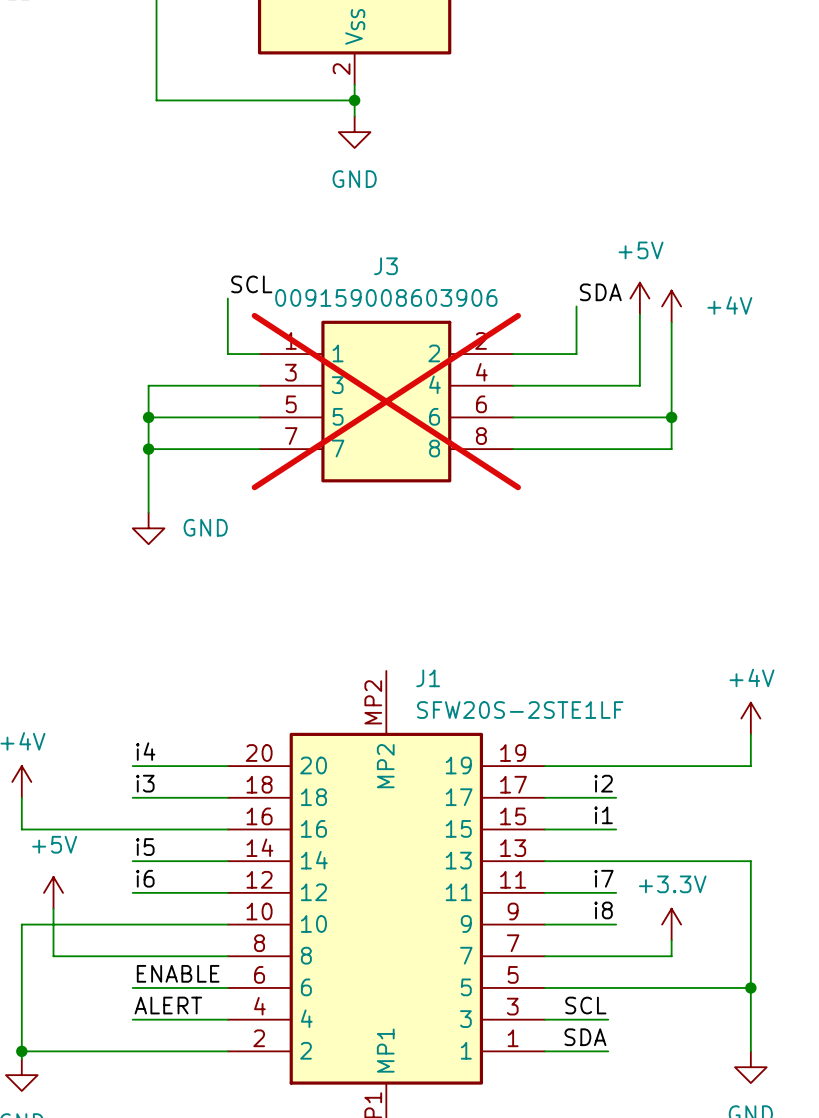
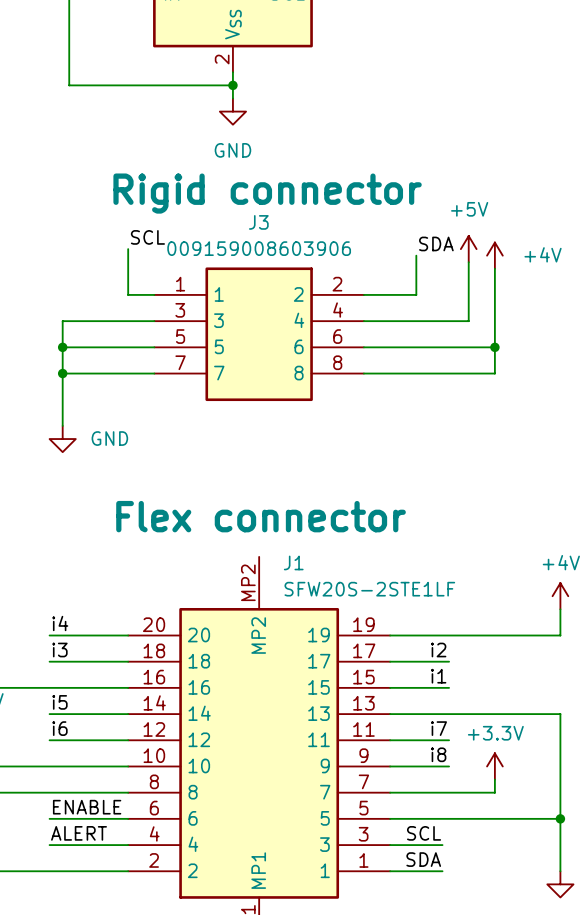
J3 text: none -> Rigid connector (267, 193)
J3 do-not-place cross: (386, 401) -> none
J1 text: none -> Flex connector (261, 516)

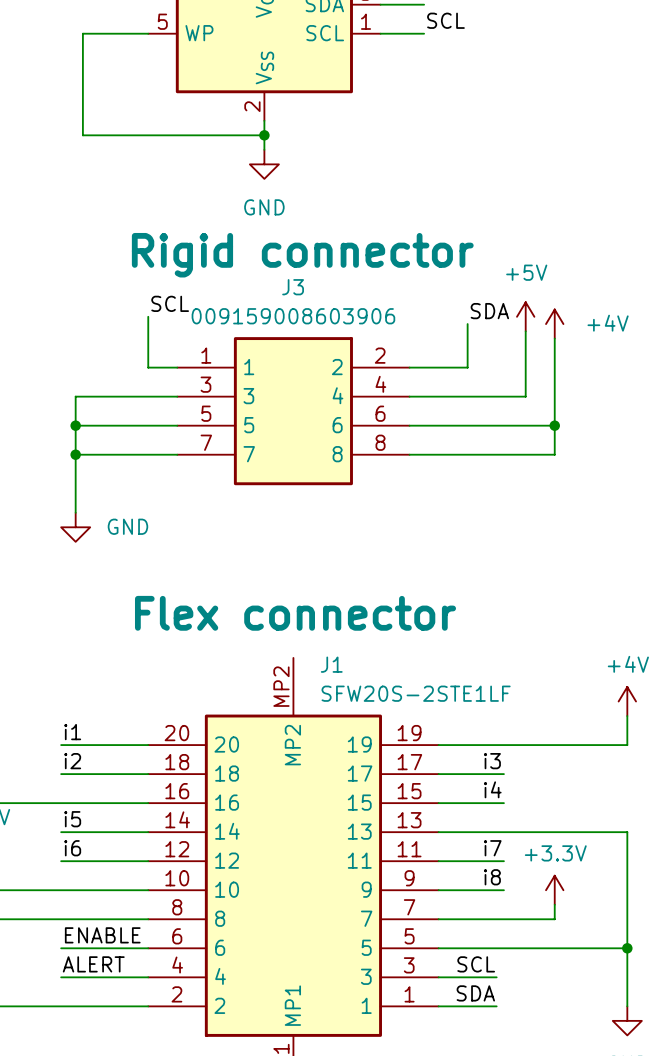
label: i4 (60, 623) -> i1 (72, 732)
label: i3 (59, 650) -> i2 (72, 761)
label: i2 (438, 650) -> i3 (492, 761)
label: i1 (438, 676) -> i4 (492, 789)

